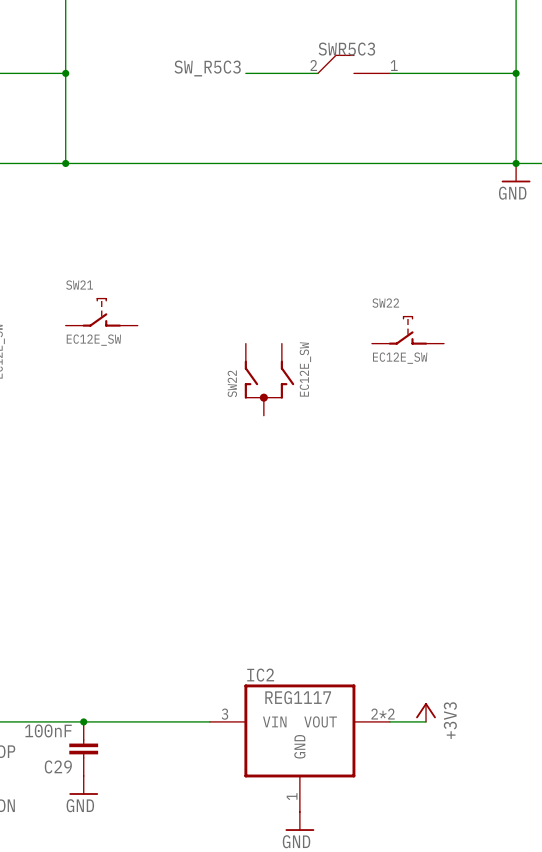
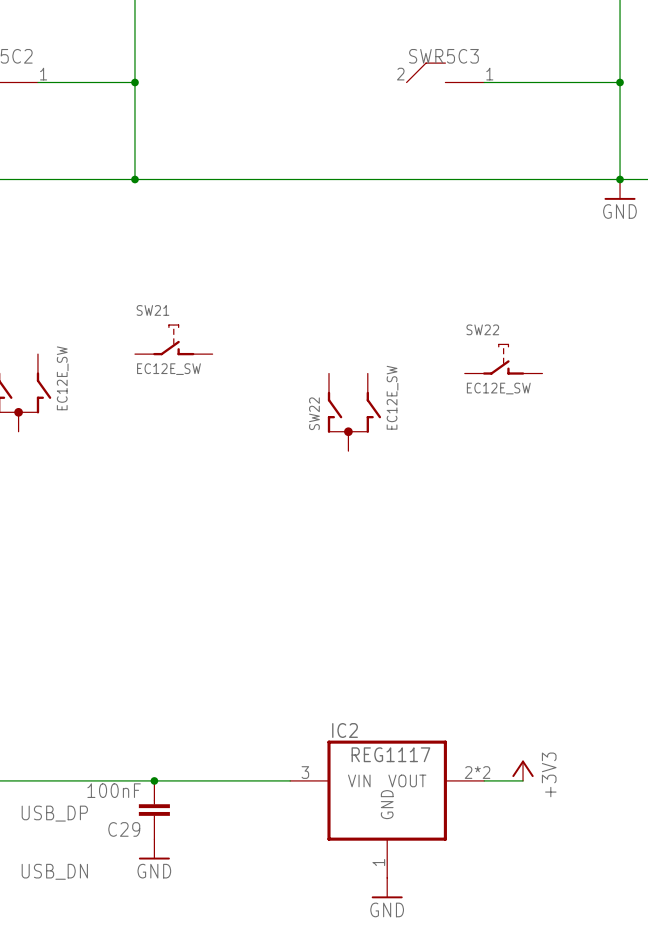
label: SW_R5C3 (207, 68) -> none
wire: (245, 73) (317, 73) -> none

